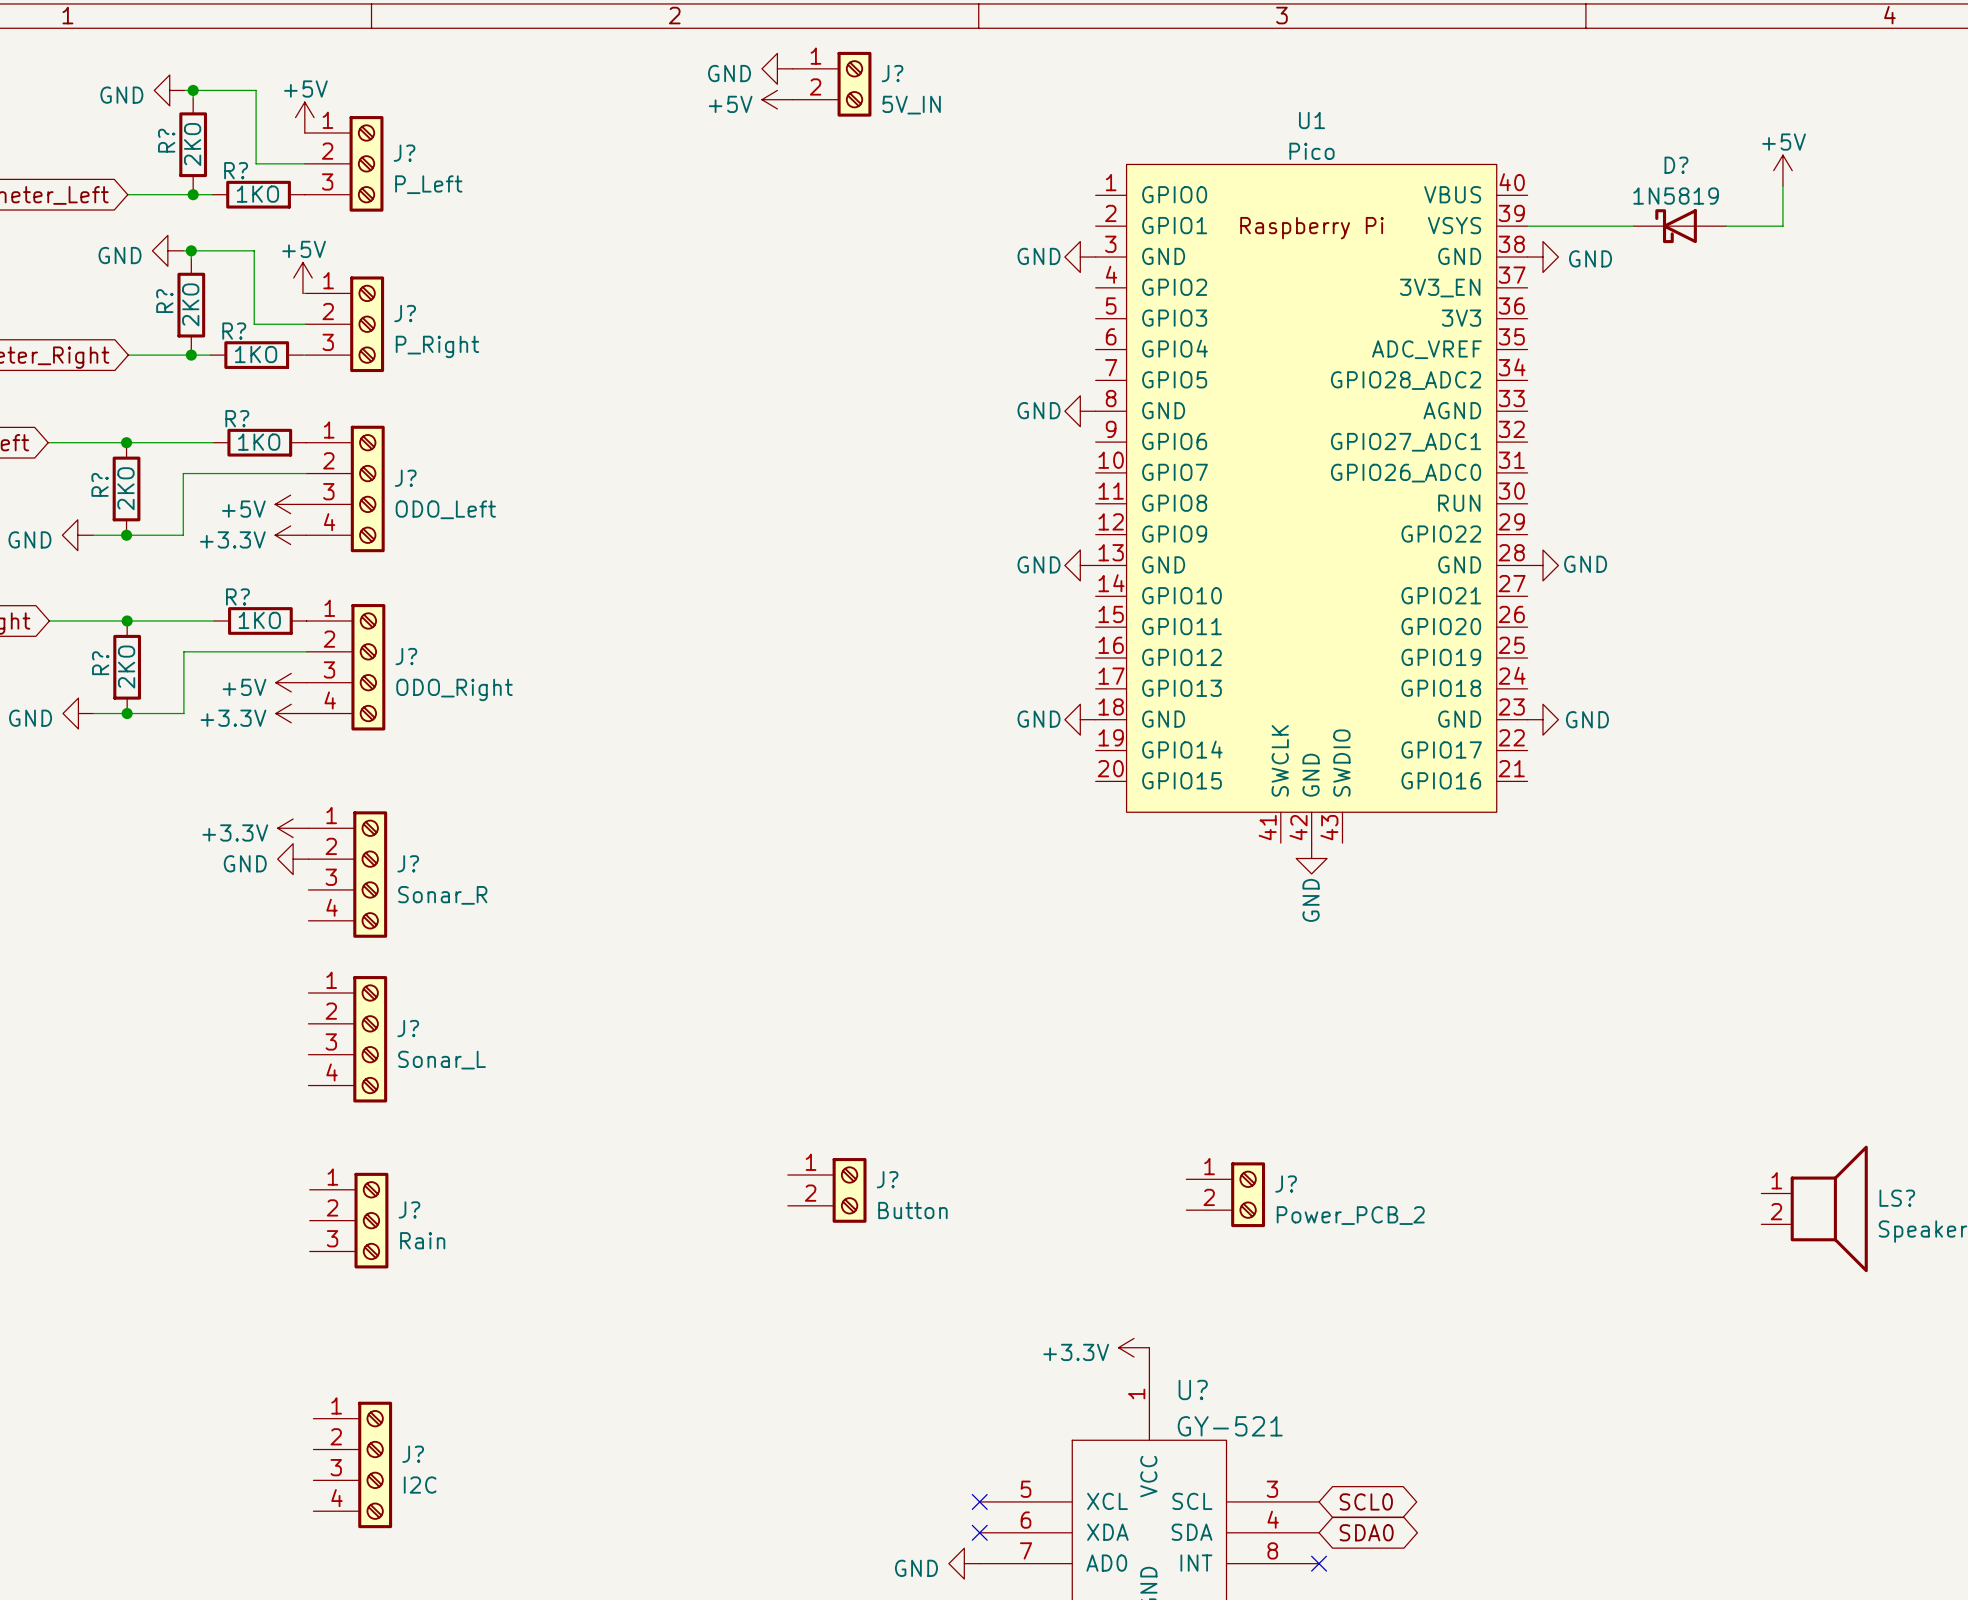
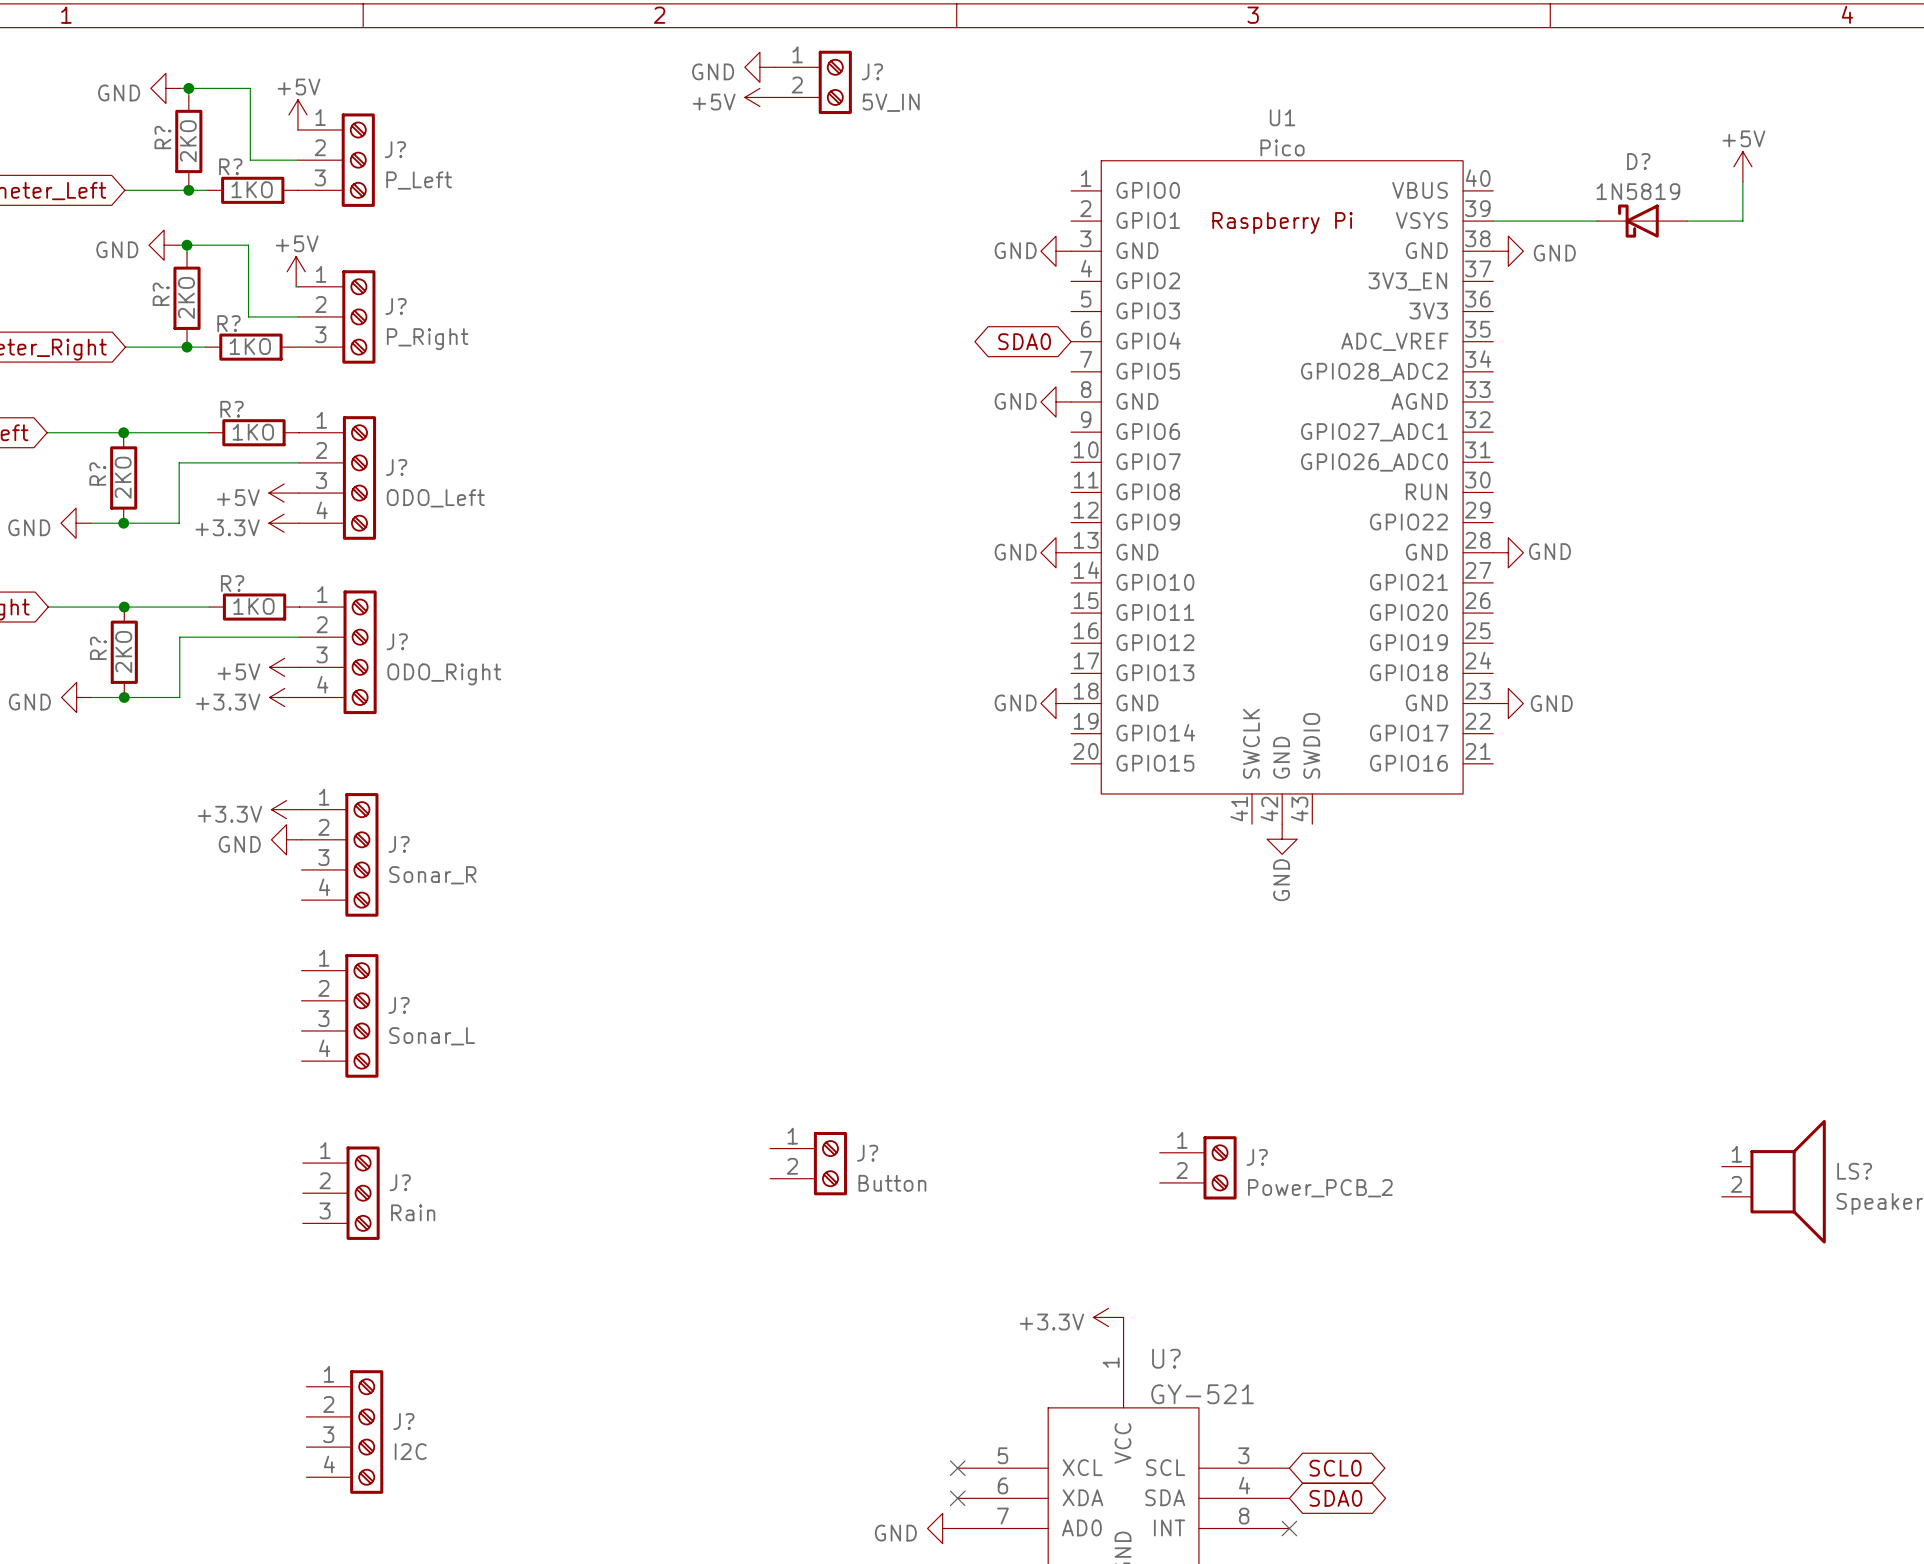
global label: none -> SDA0 (1024, 341)

